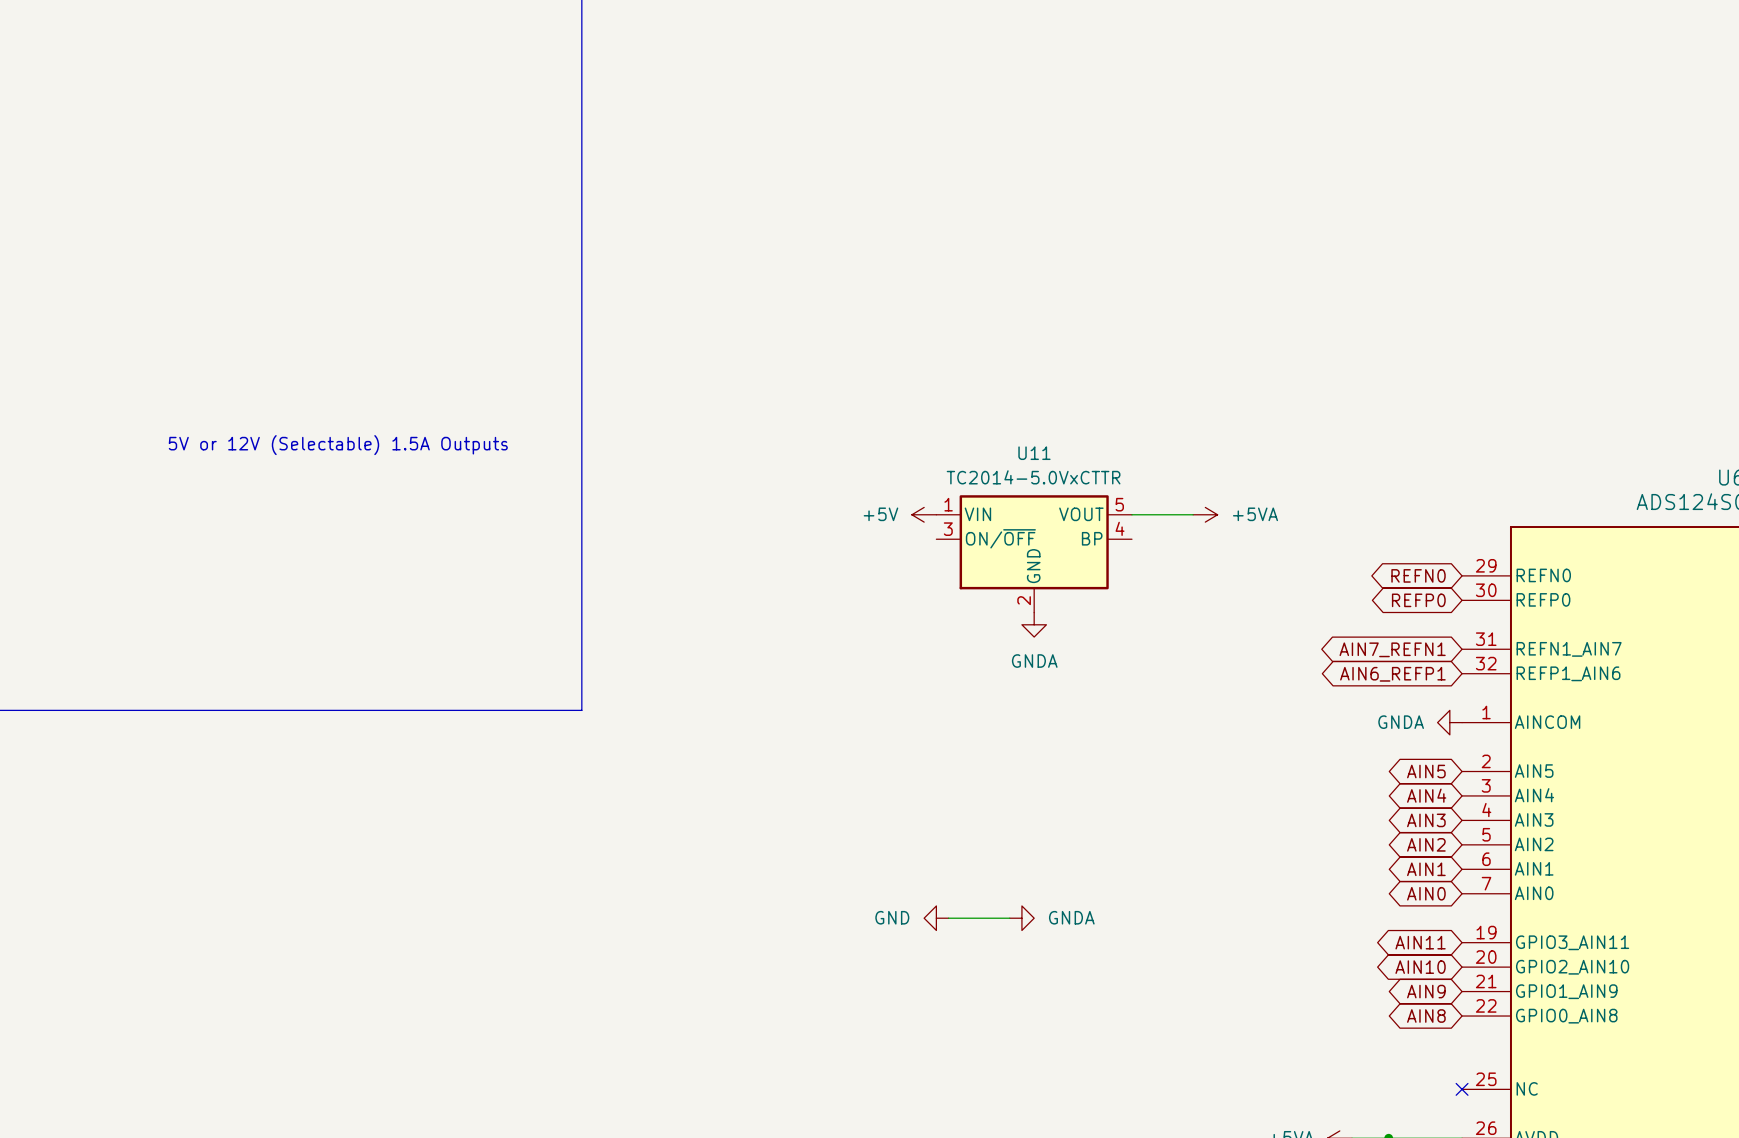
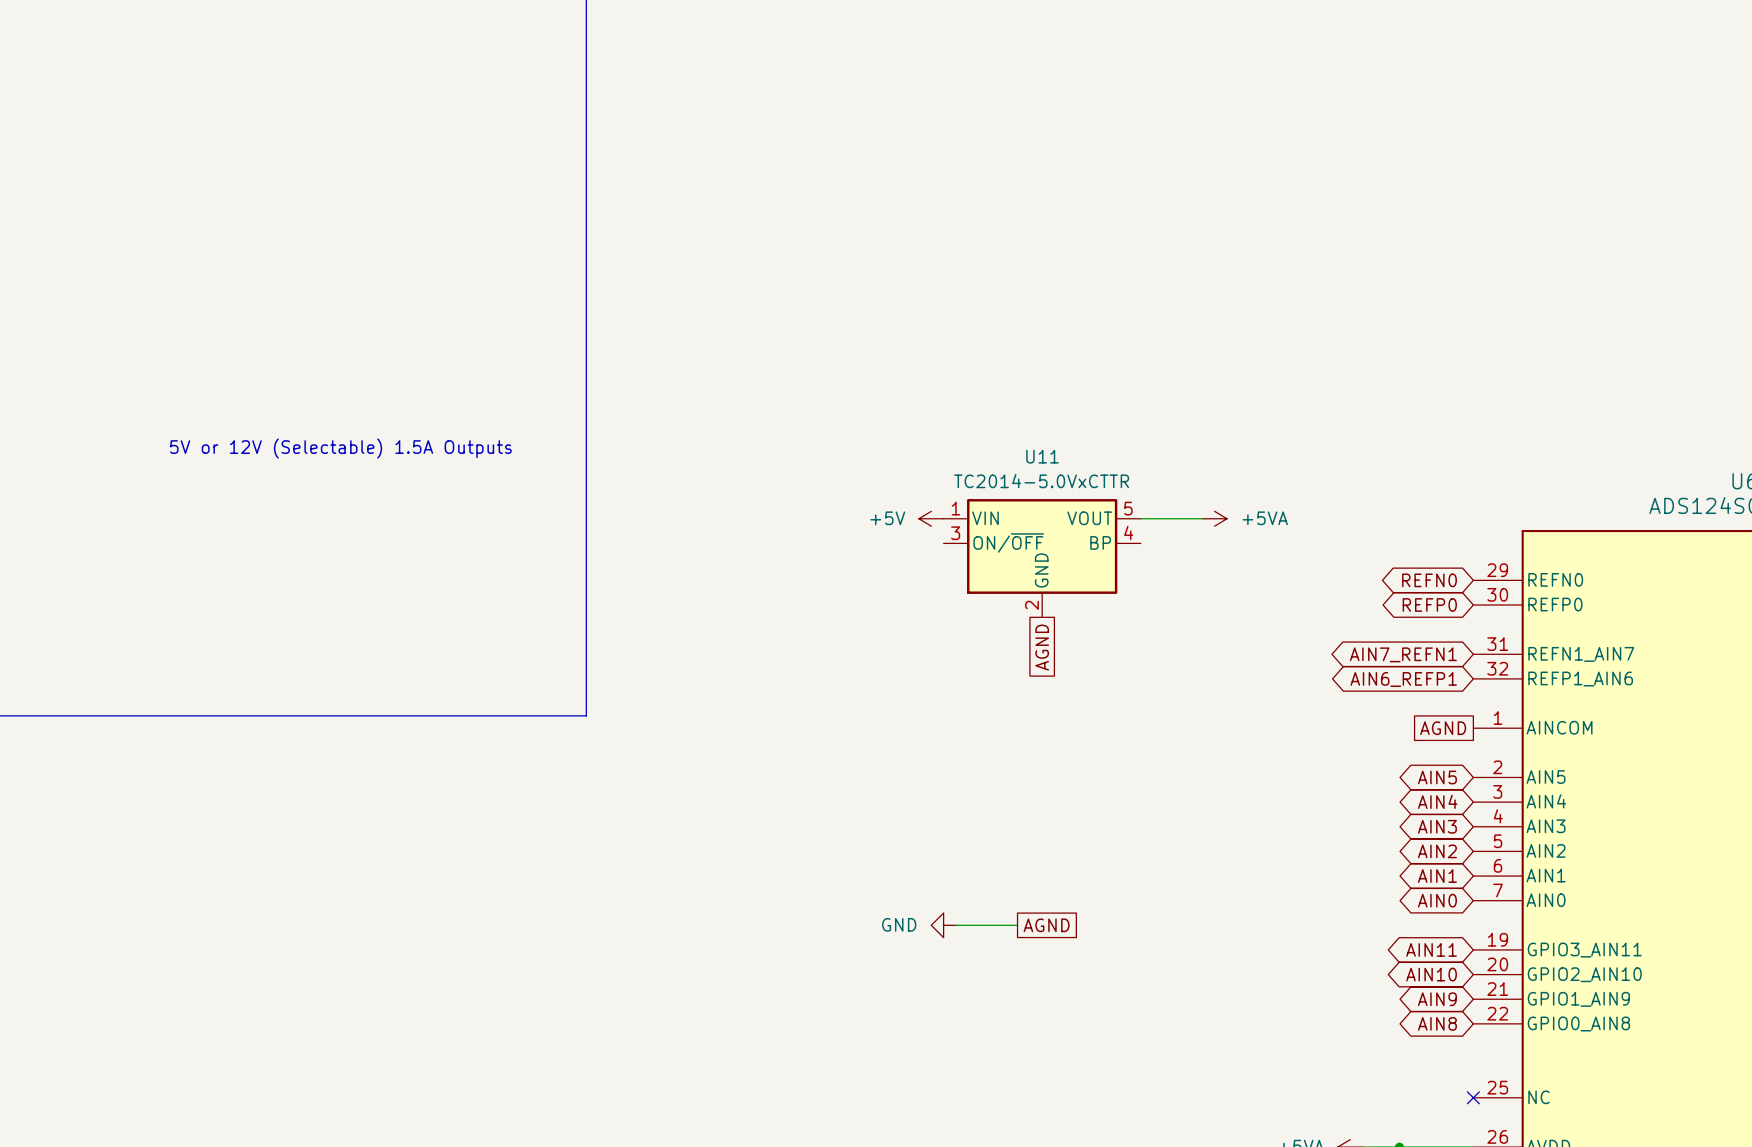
power symbol: GNDA (1034, 624) -> none
global label: none -> AGND (1042, 647)
global label: none -> AGND (1443, 728)
power symbol: GNDA (1449, 722) -> none
power symbol: GNDA (1021, 918) -> none
global label: none -> AGND (1046, 925)

